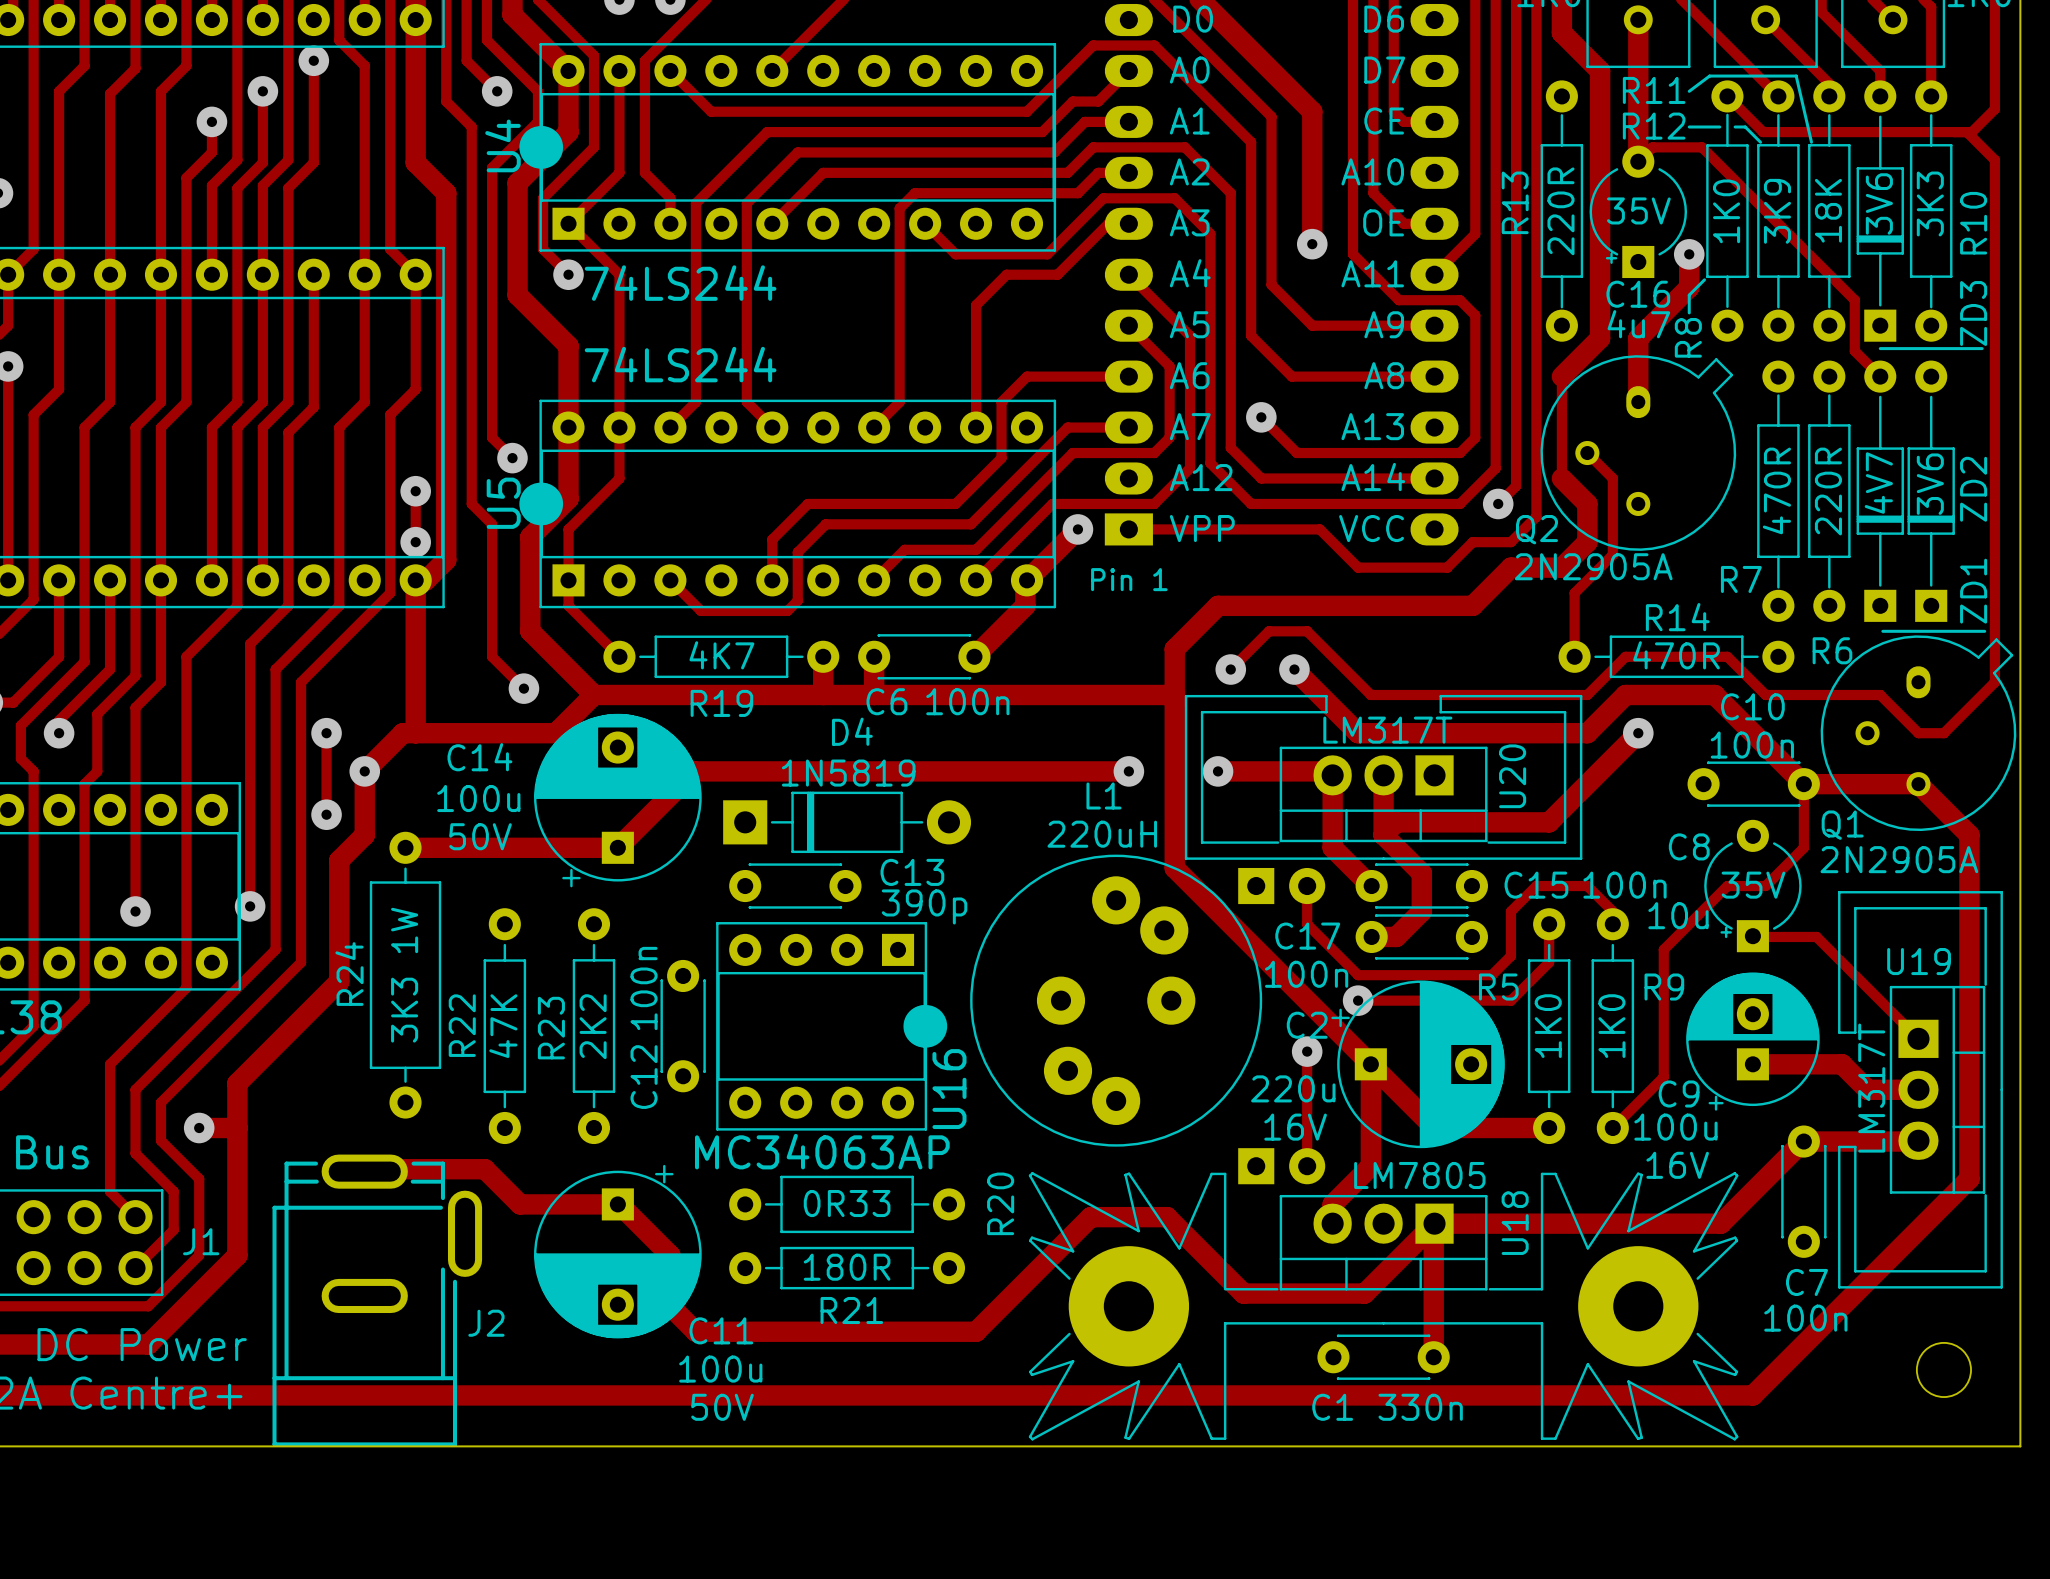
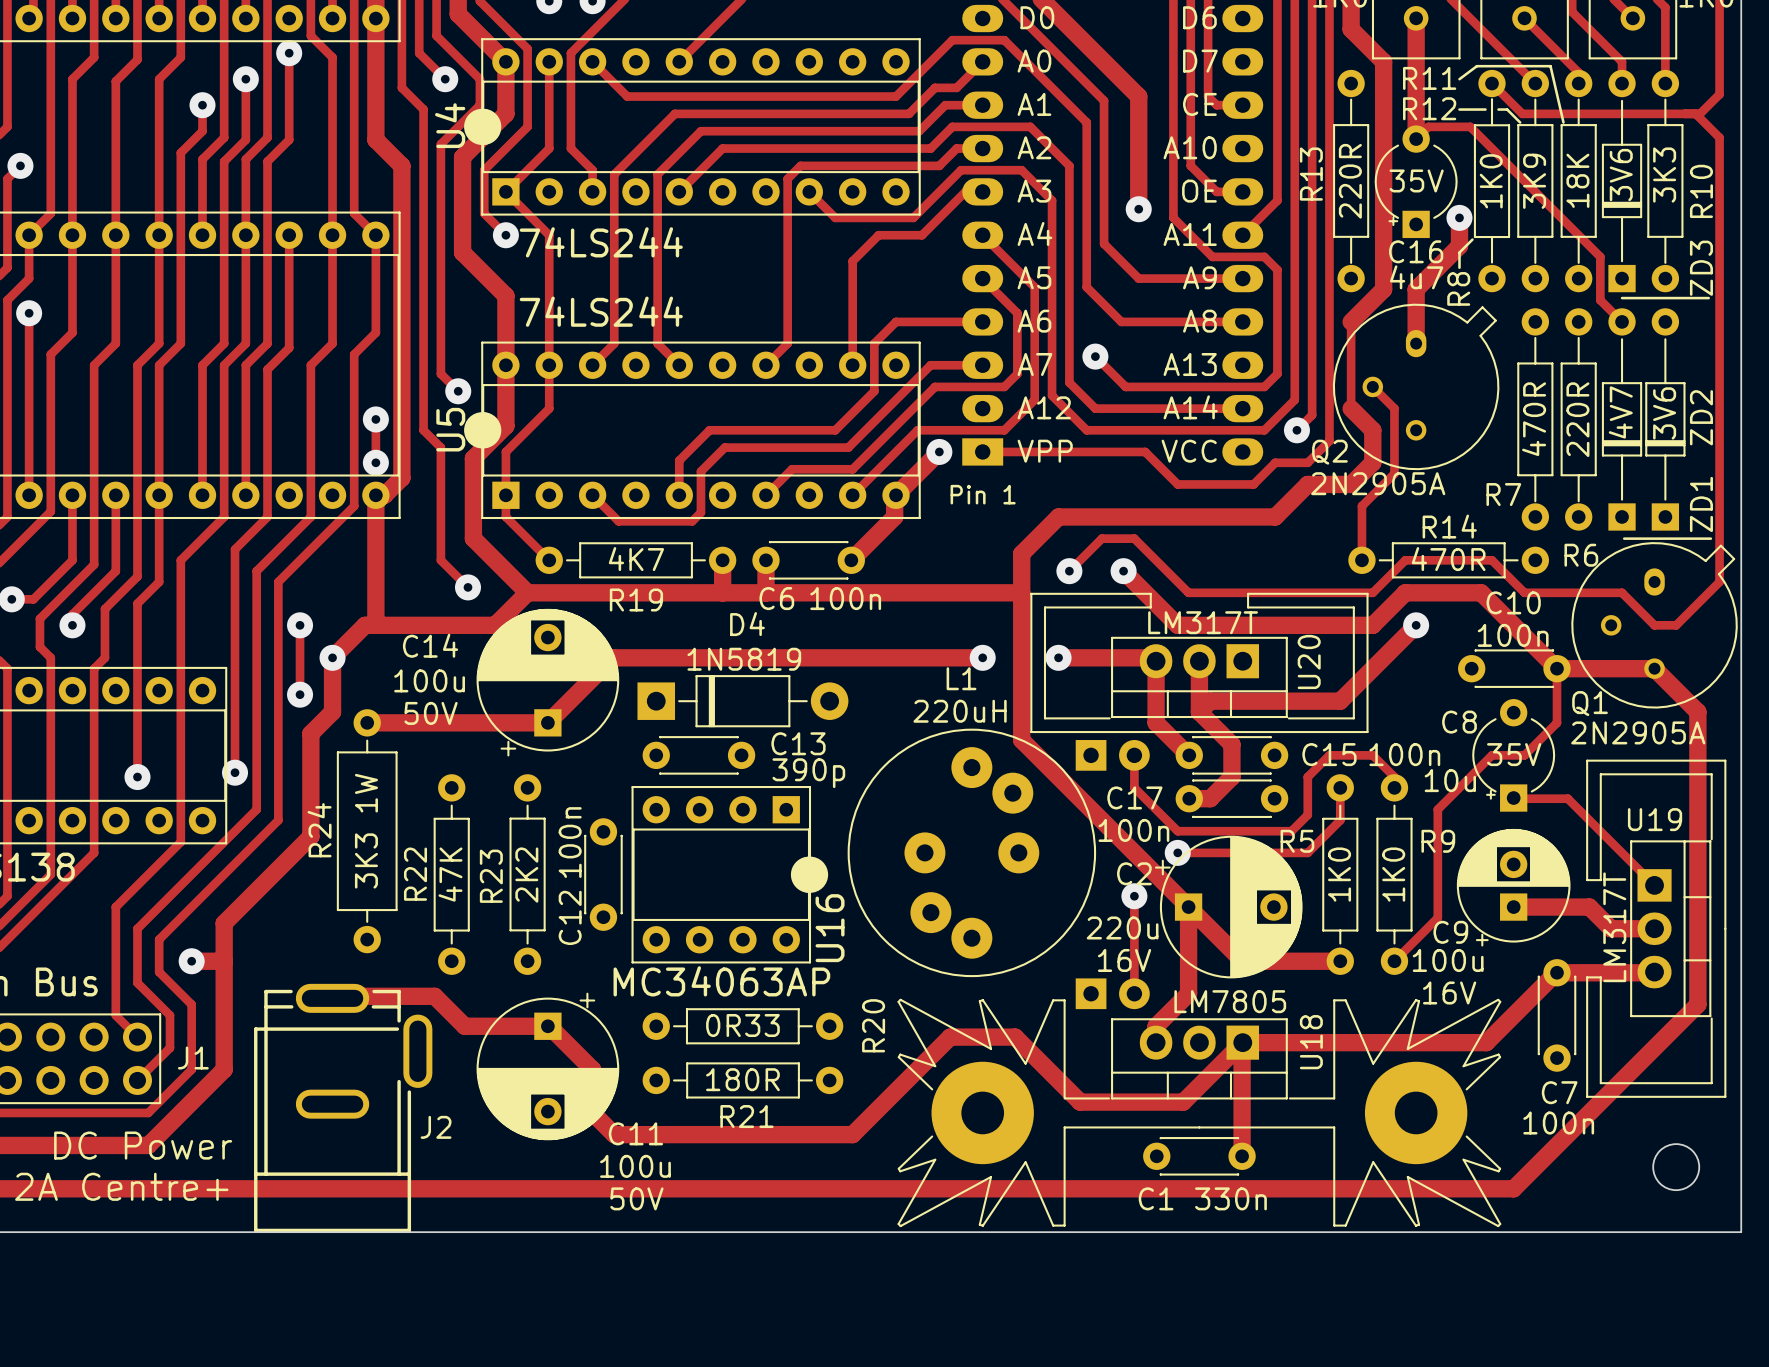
R20 footprint: [729, 1175, 966, 1234] -> [642, 1008, 844, 1045]

